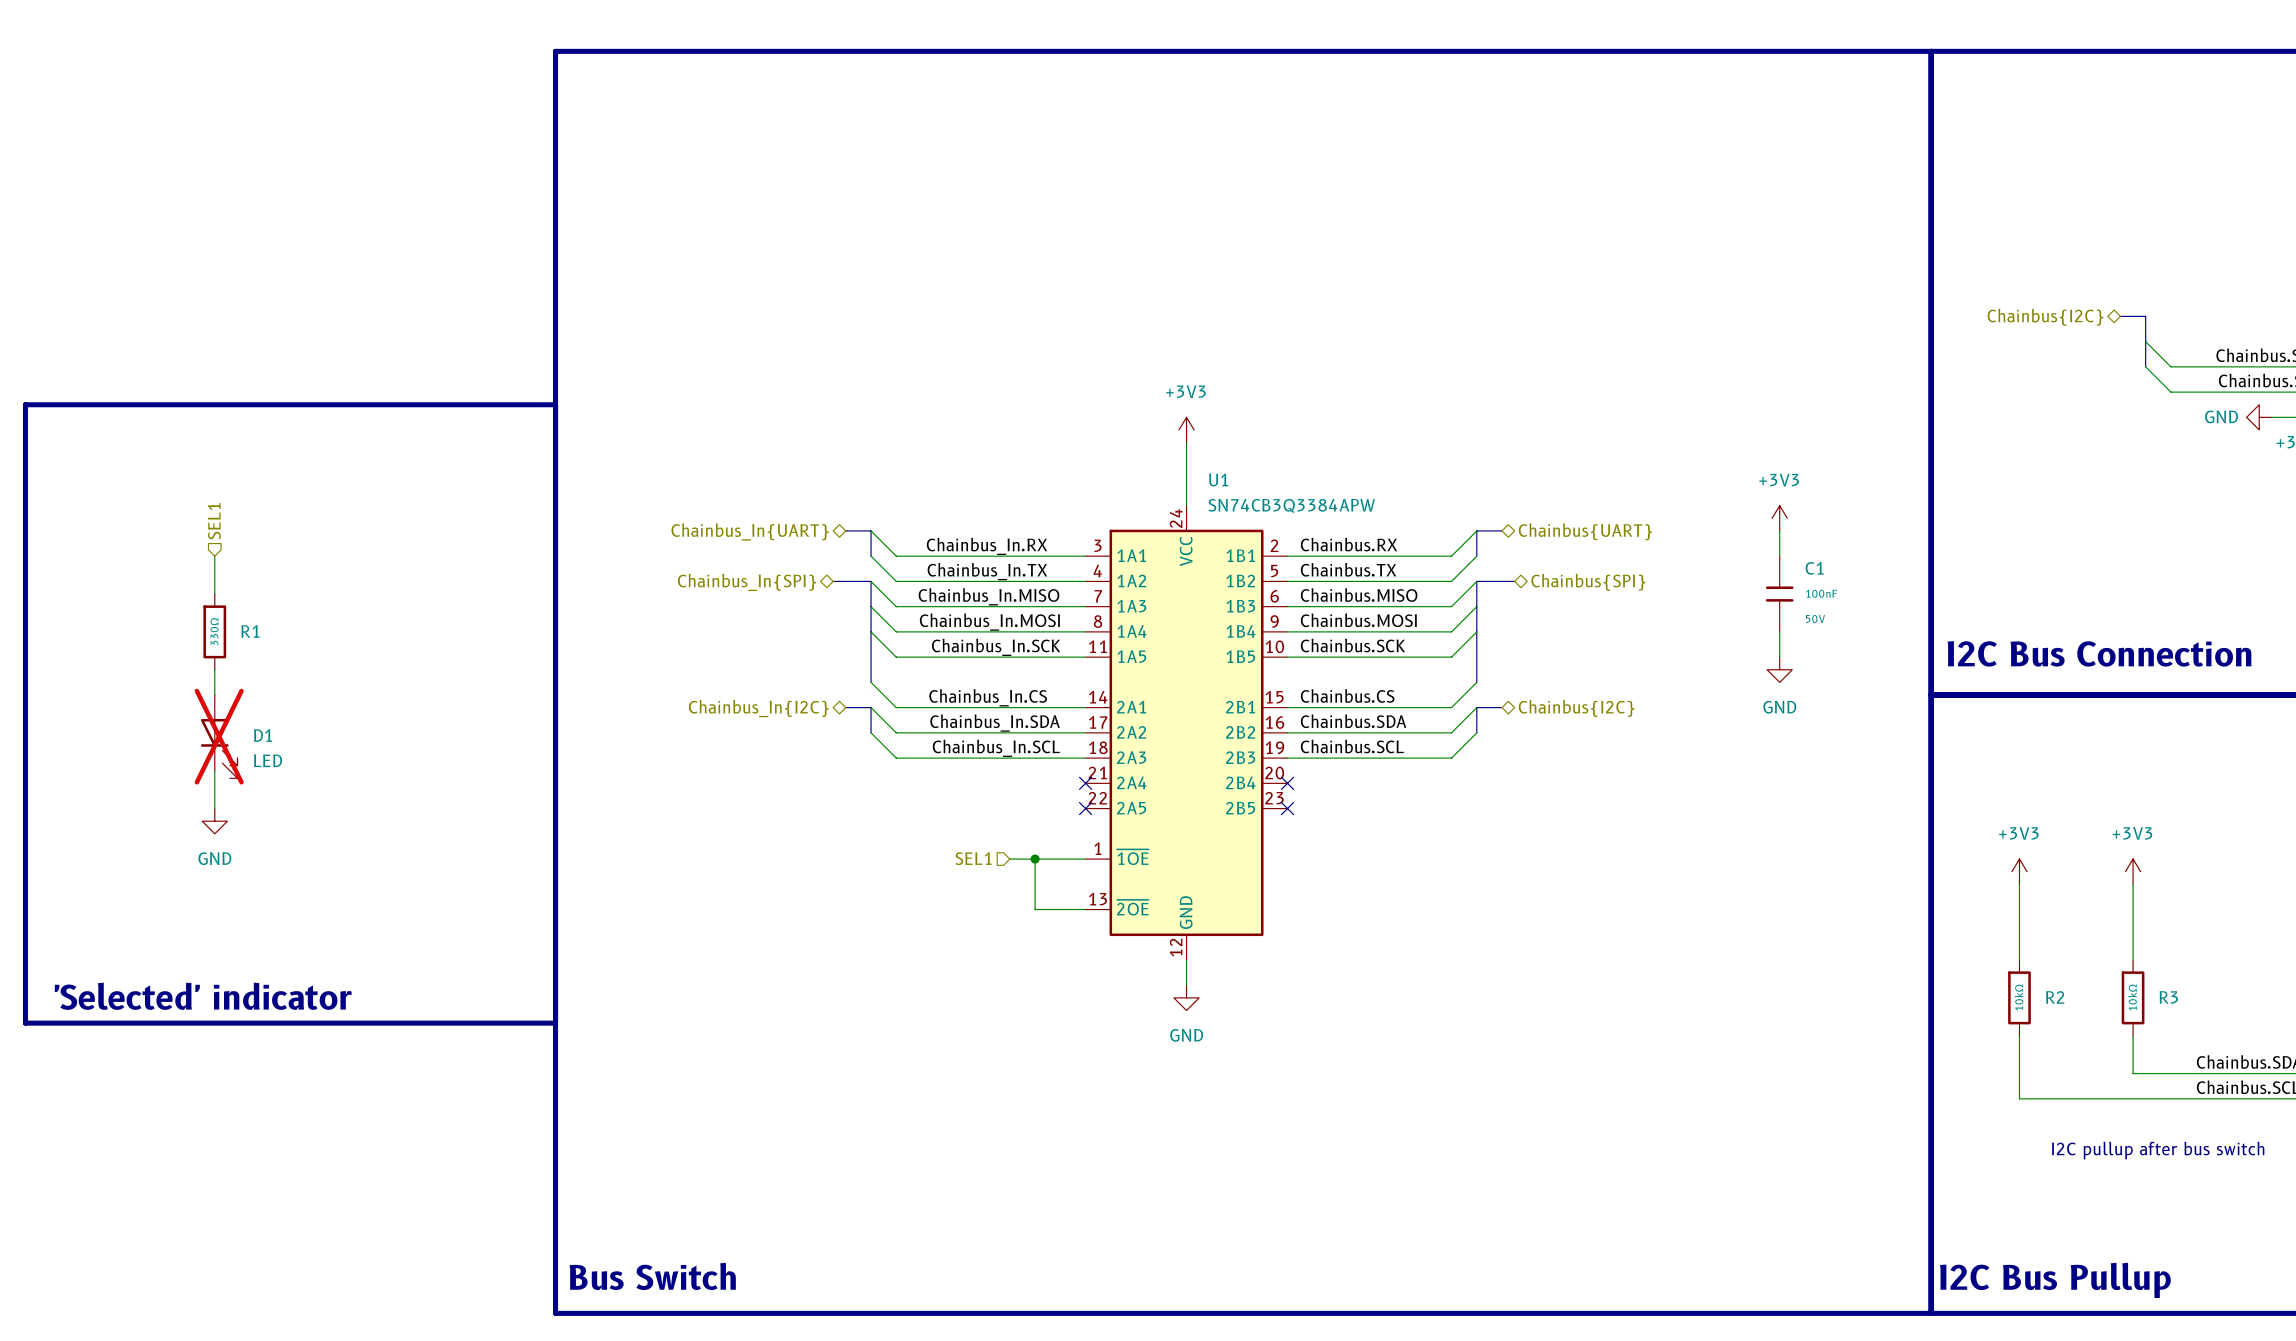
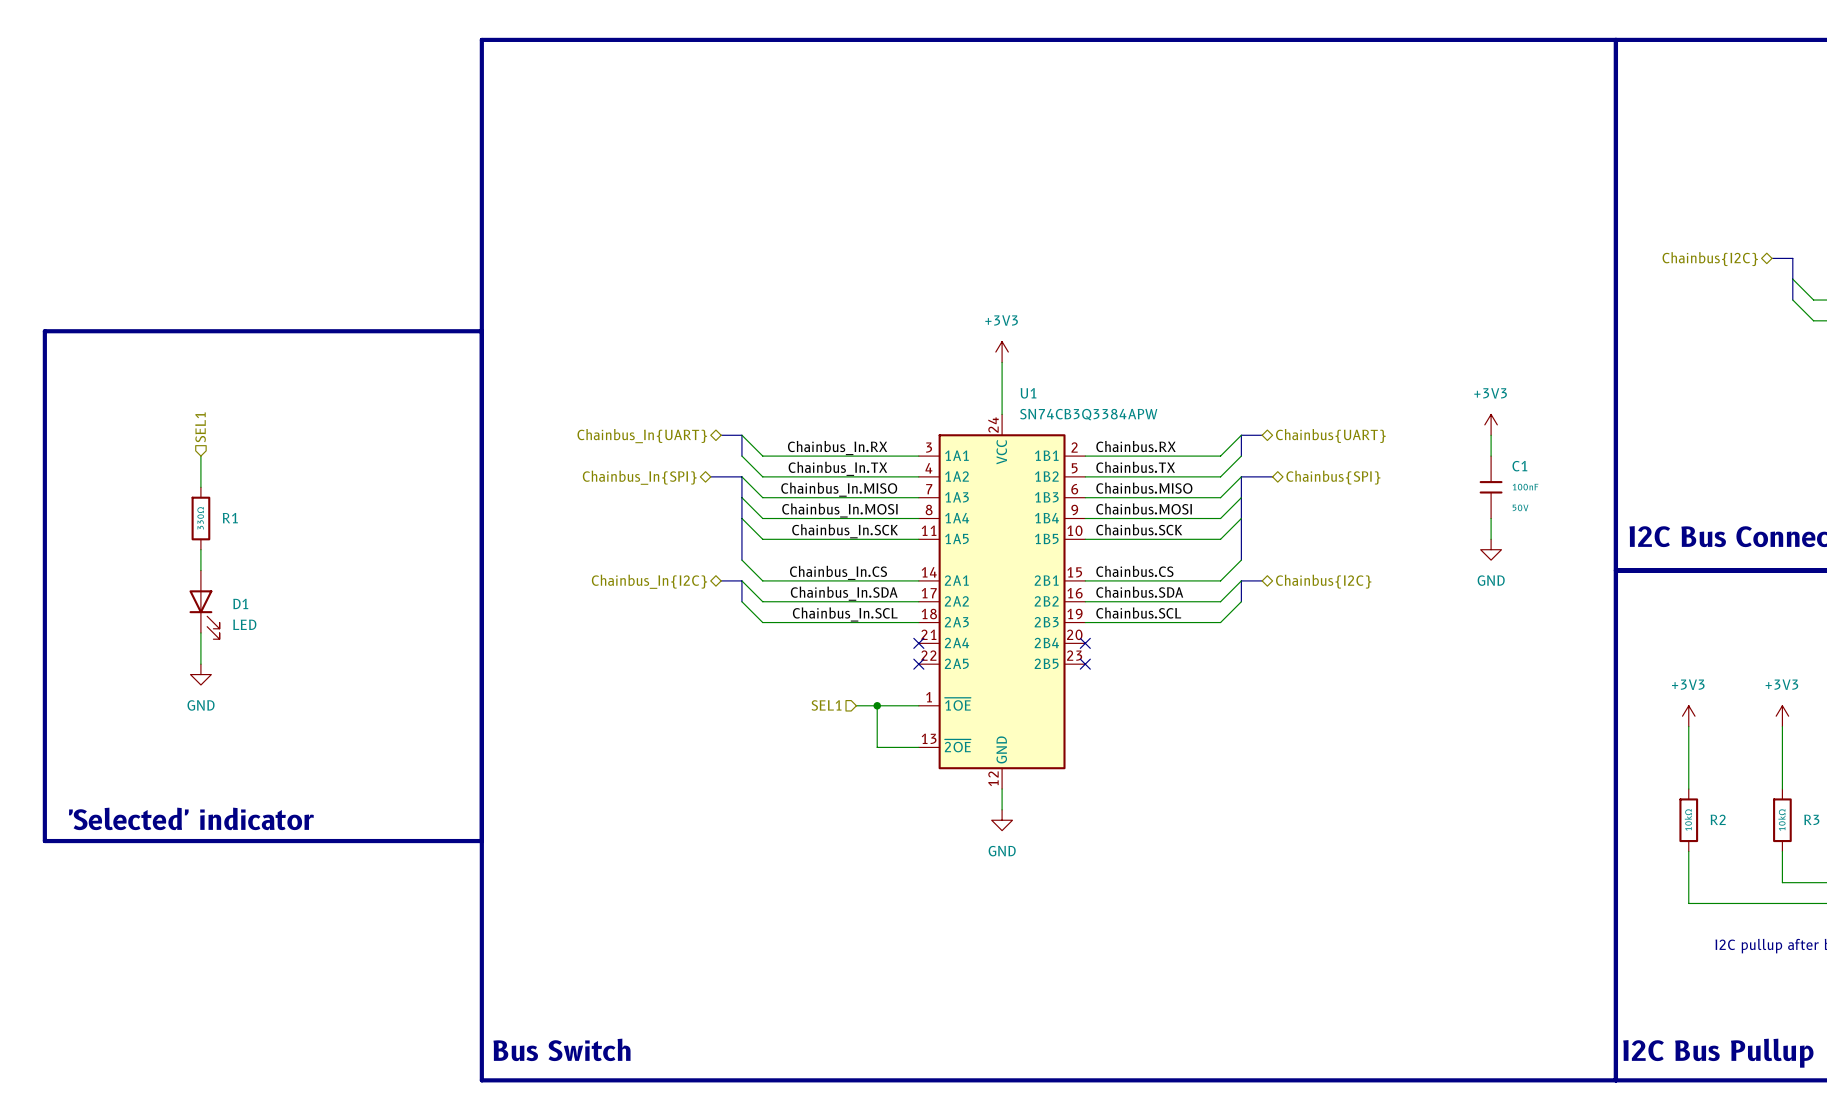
D1 do-not-place cross: (219, 736) -> none

